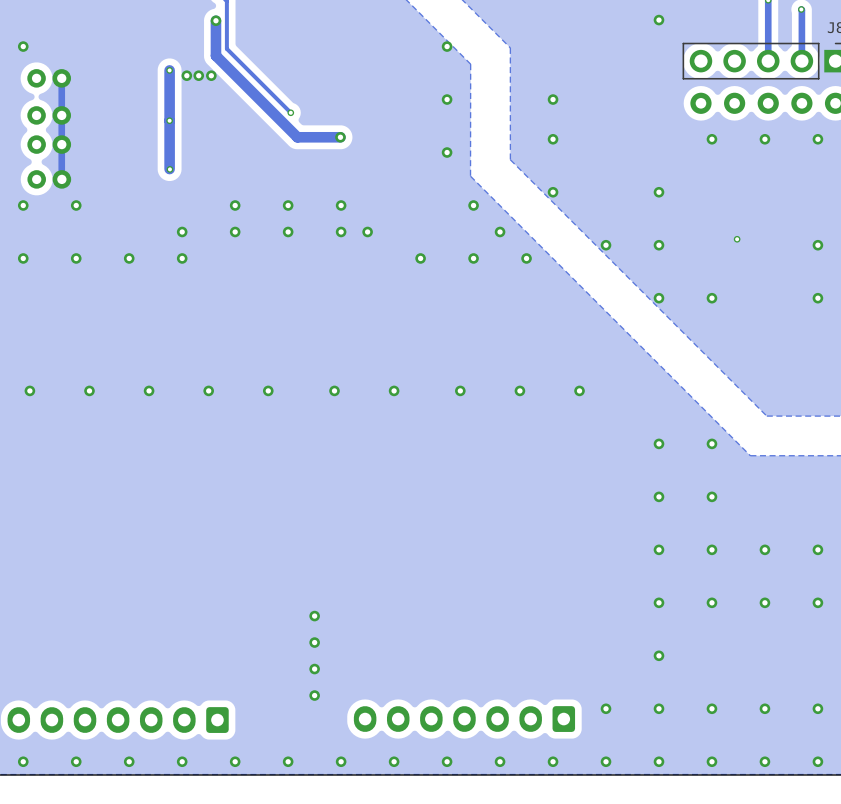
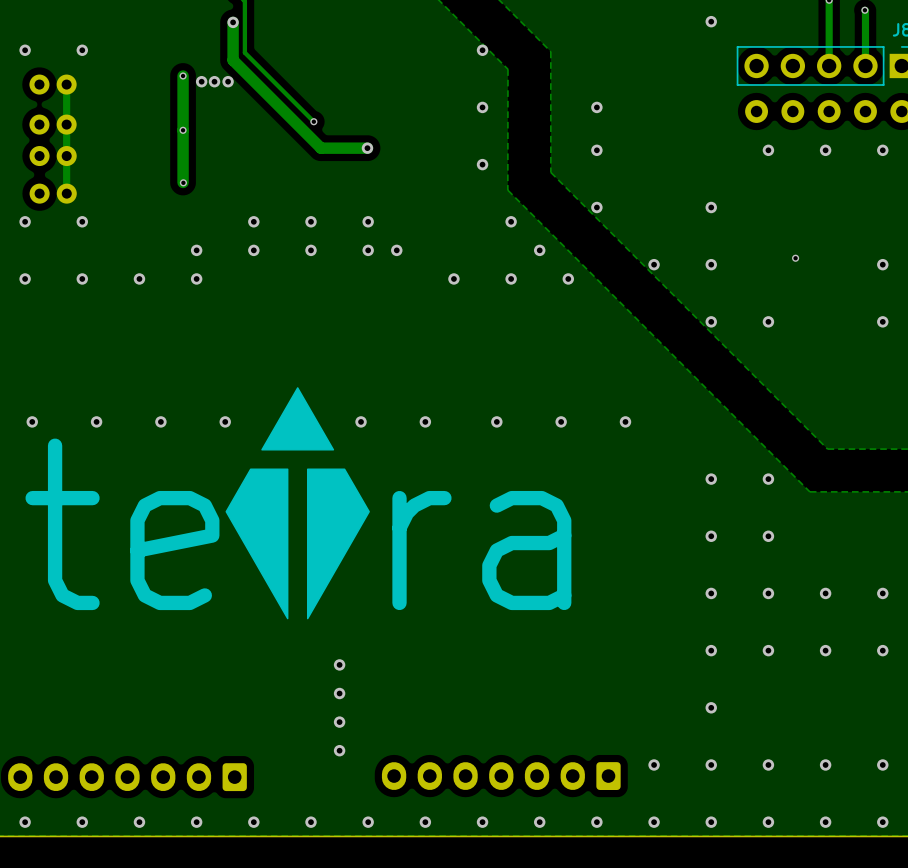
via: none -> (82, 50)
drawing: none -> [225, 387, 370, 620]

